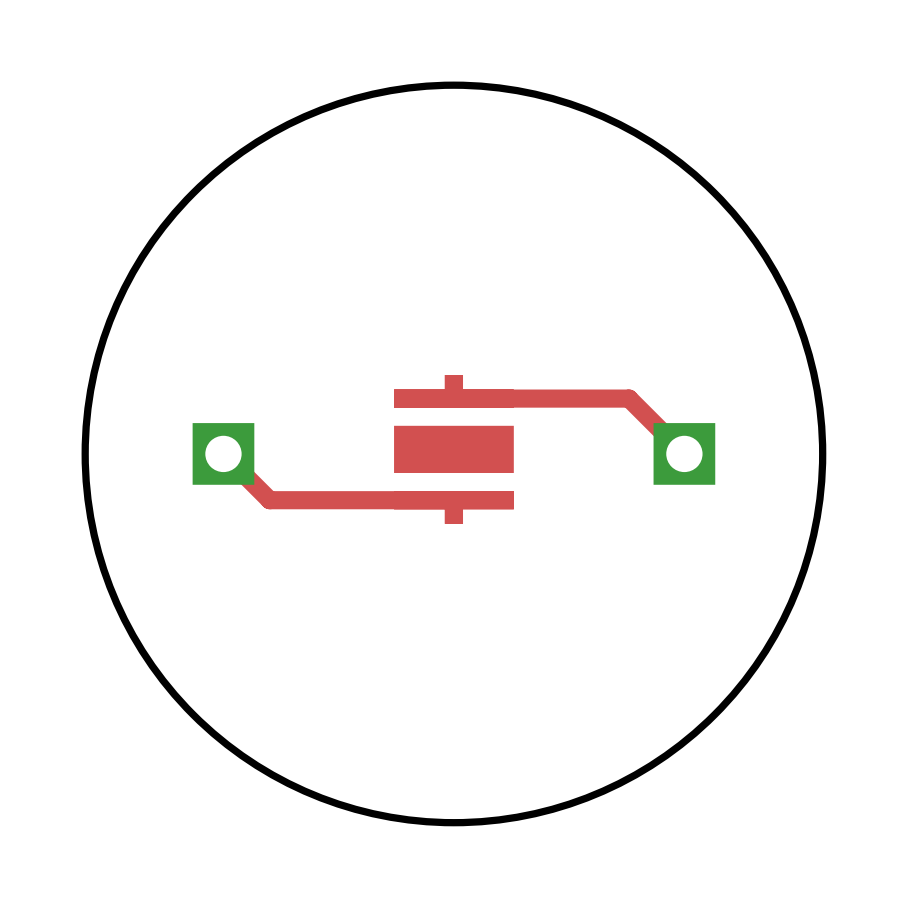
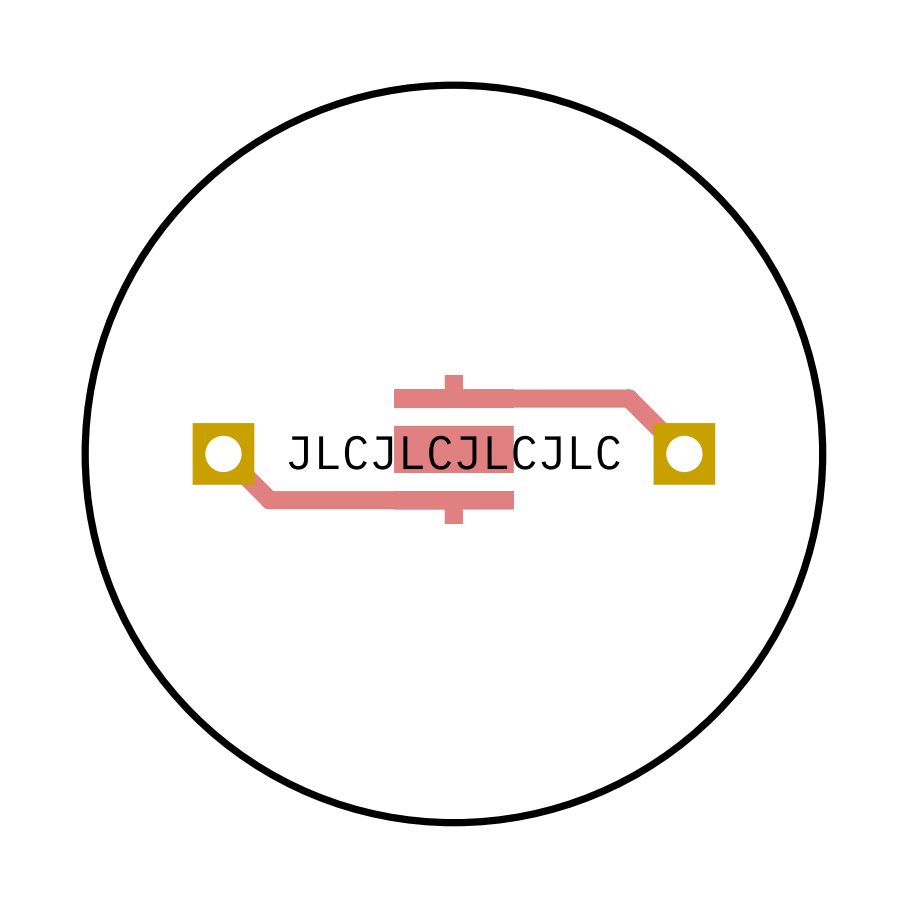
text: none -> JLCJLCJLCJLC (454, 452)

